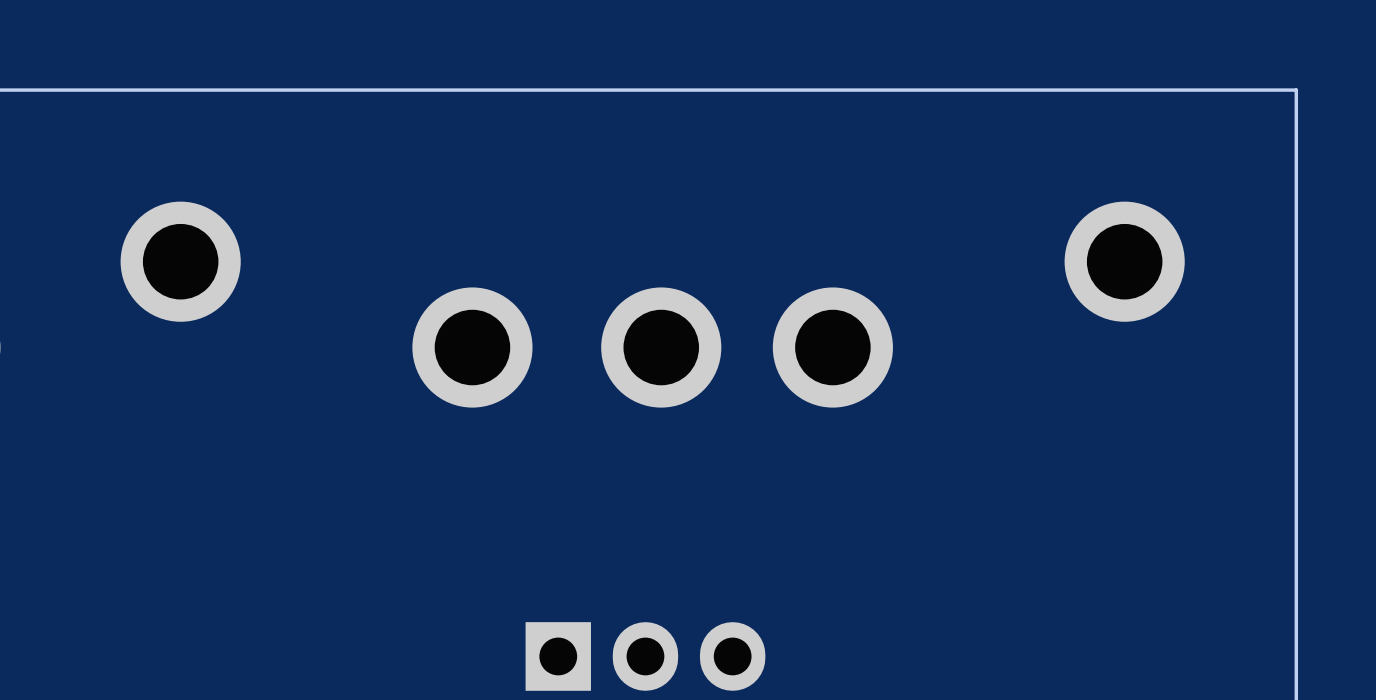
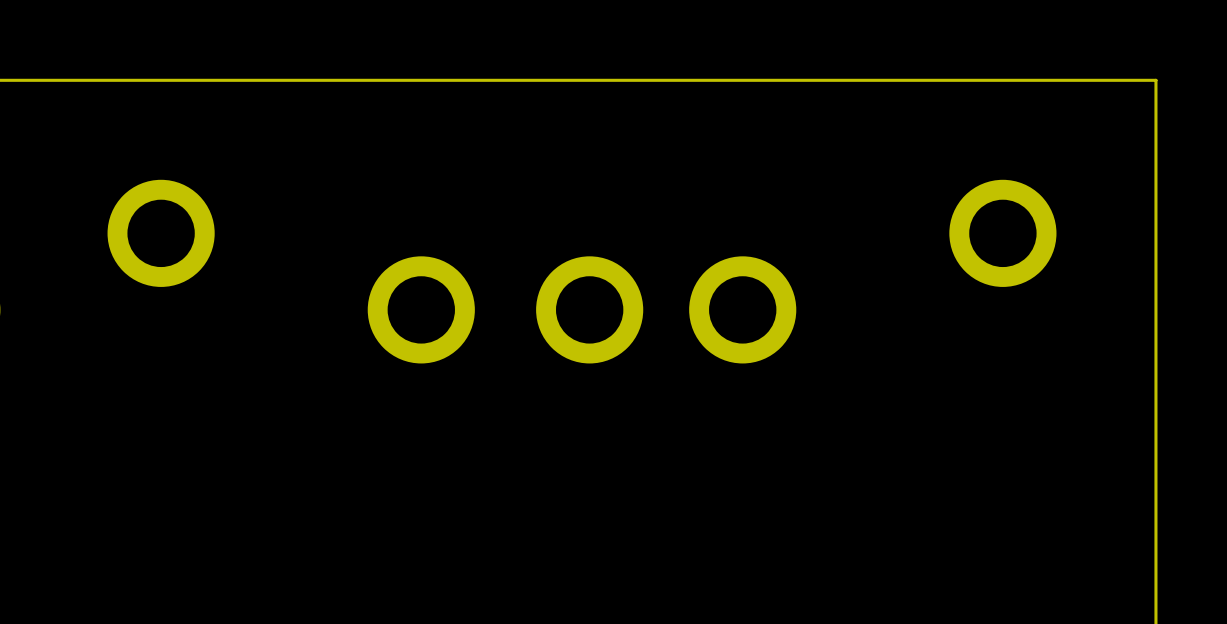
part: (645, 656) -> none

